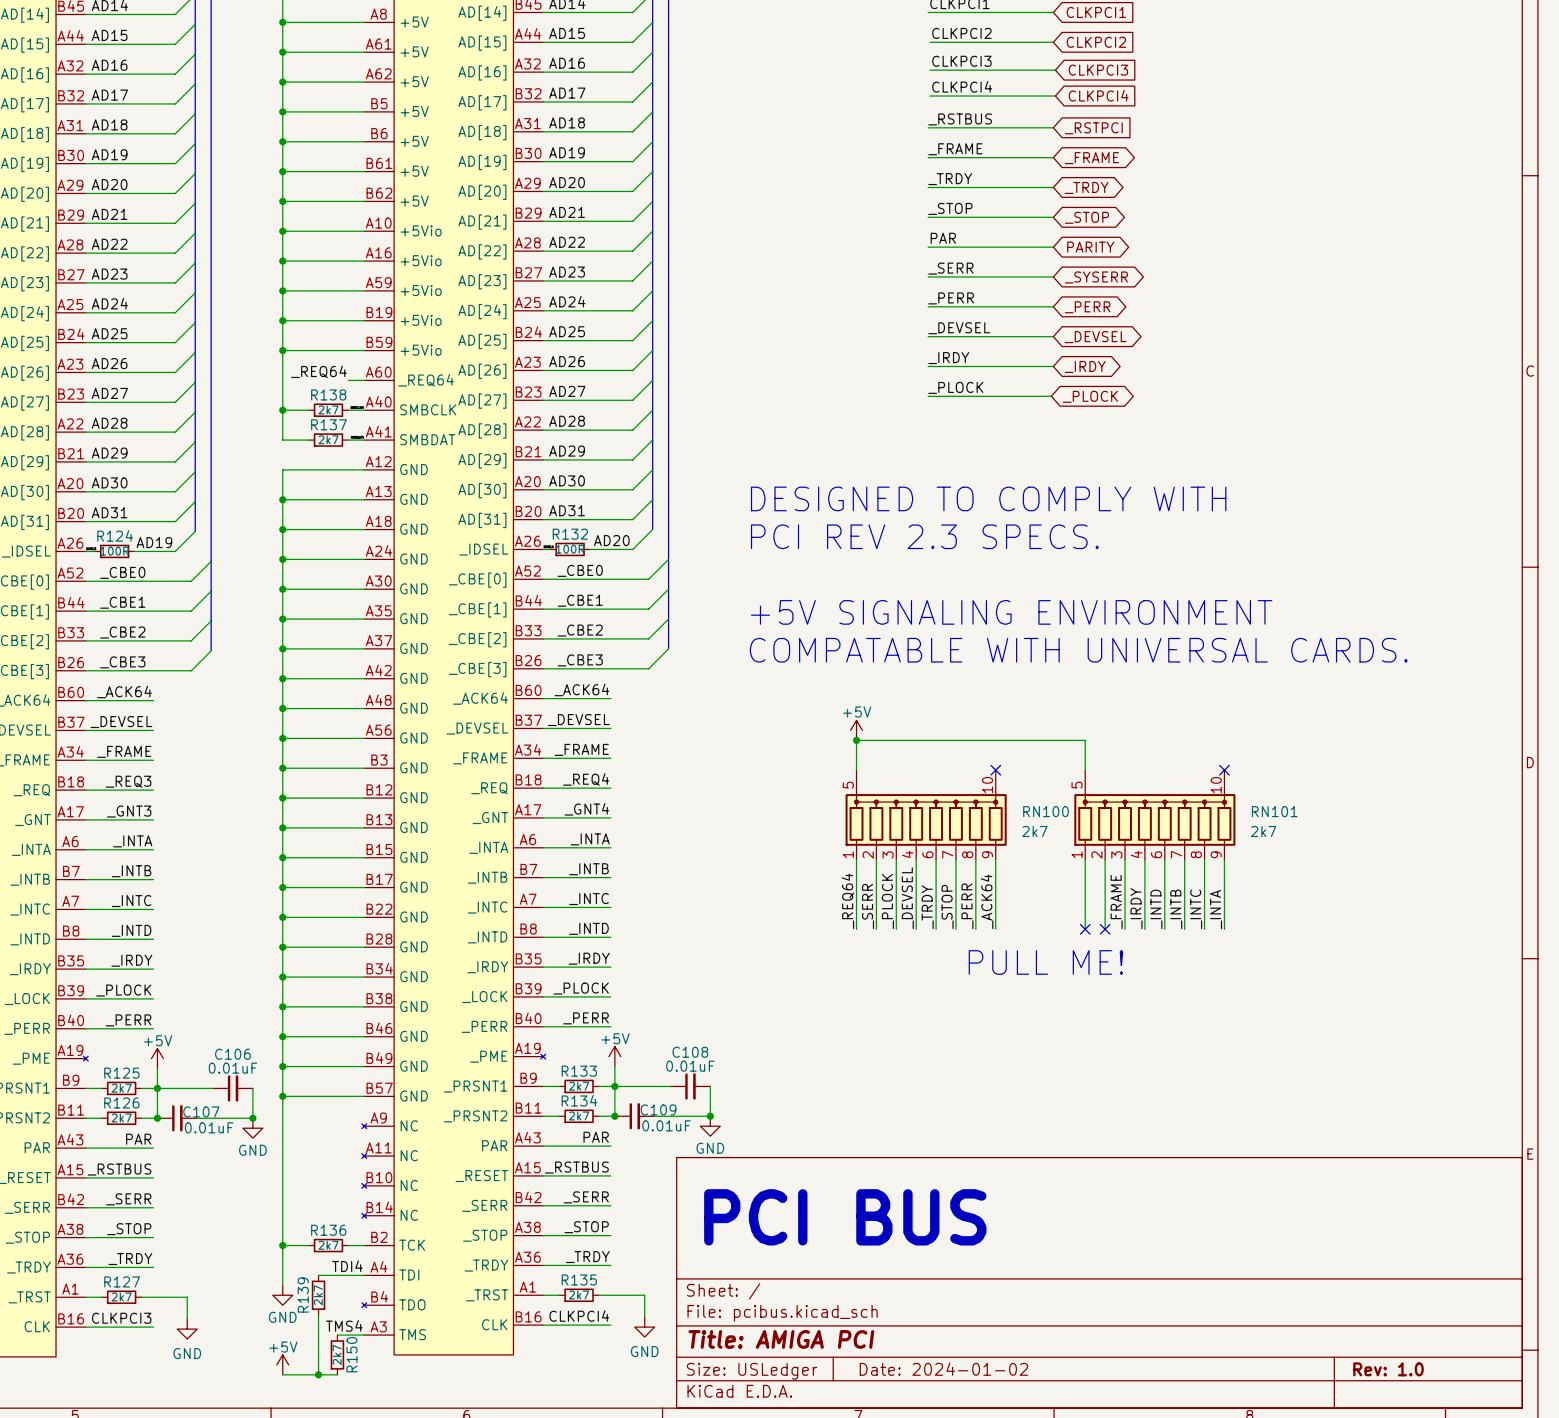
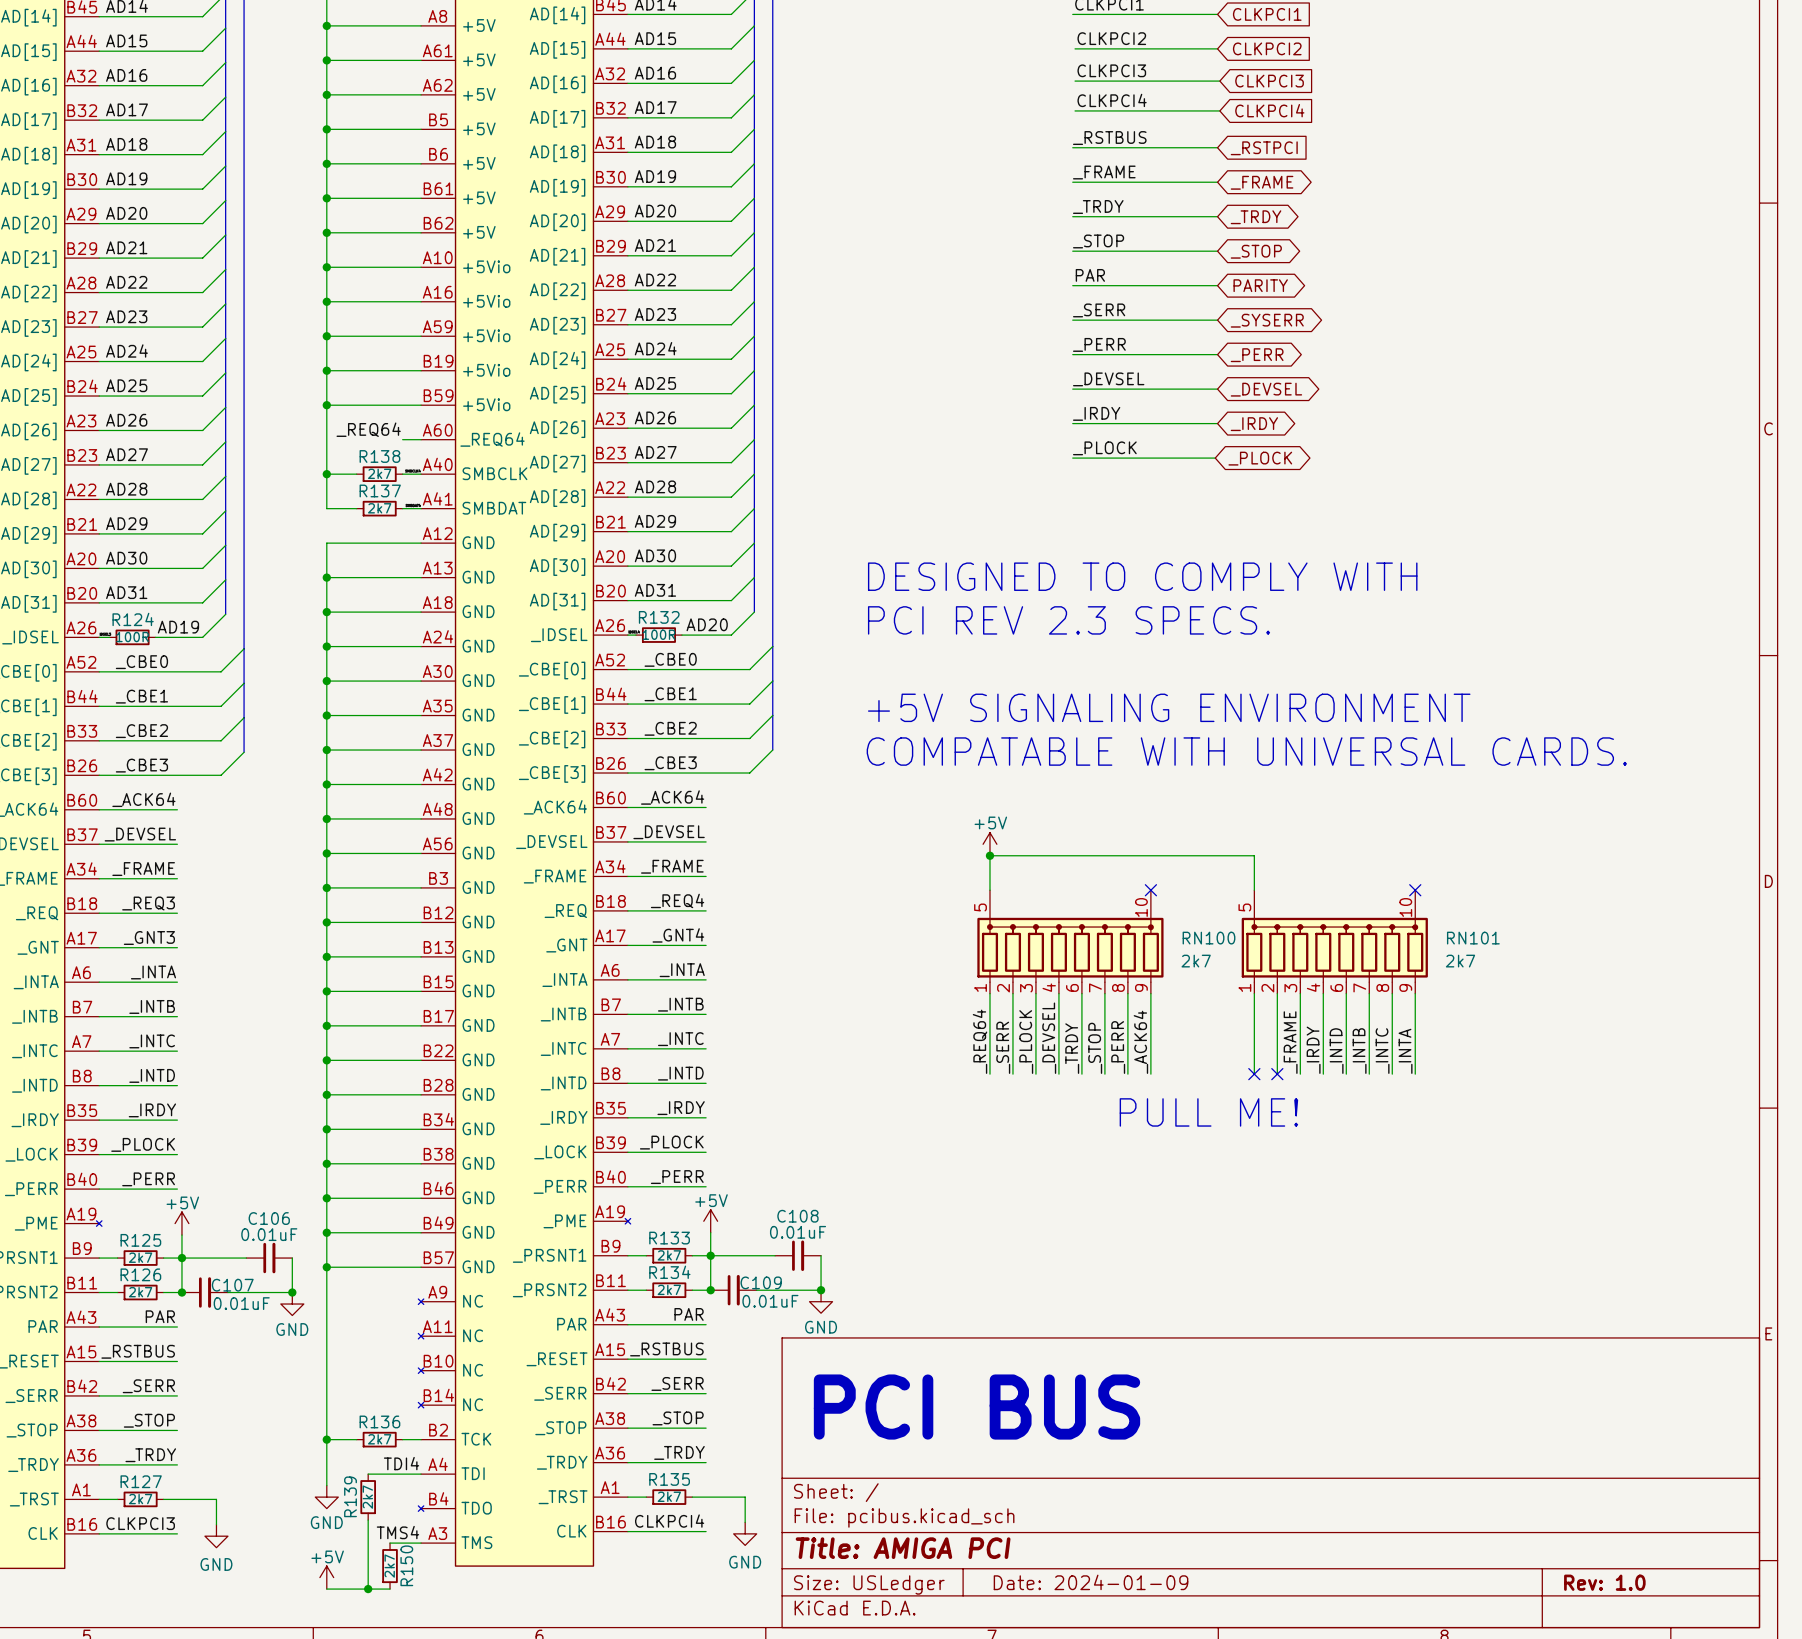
title block: Date: 2024-01-02 (943, 1369) -> Date: 2024-01-09 (1091, 1582)

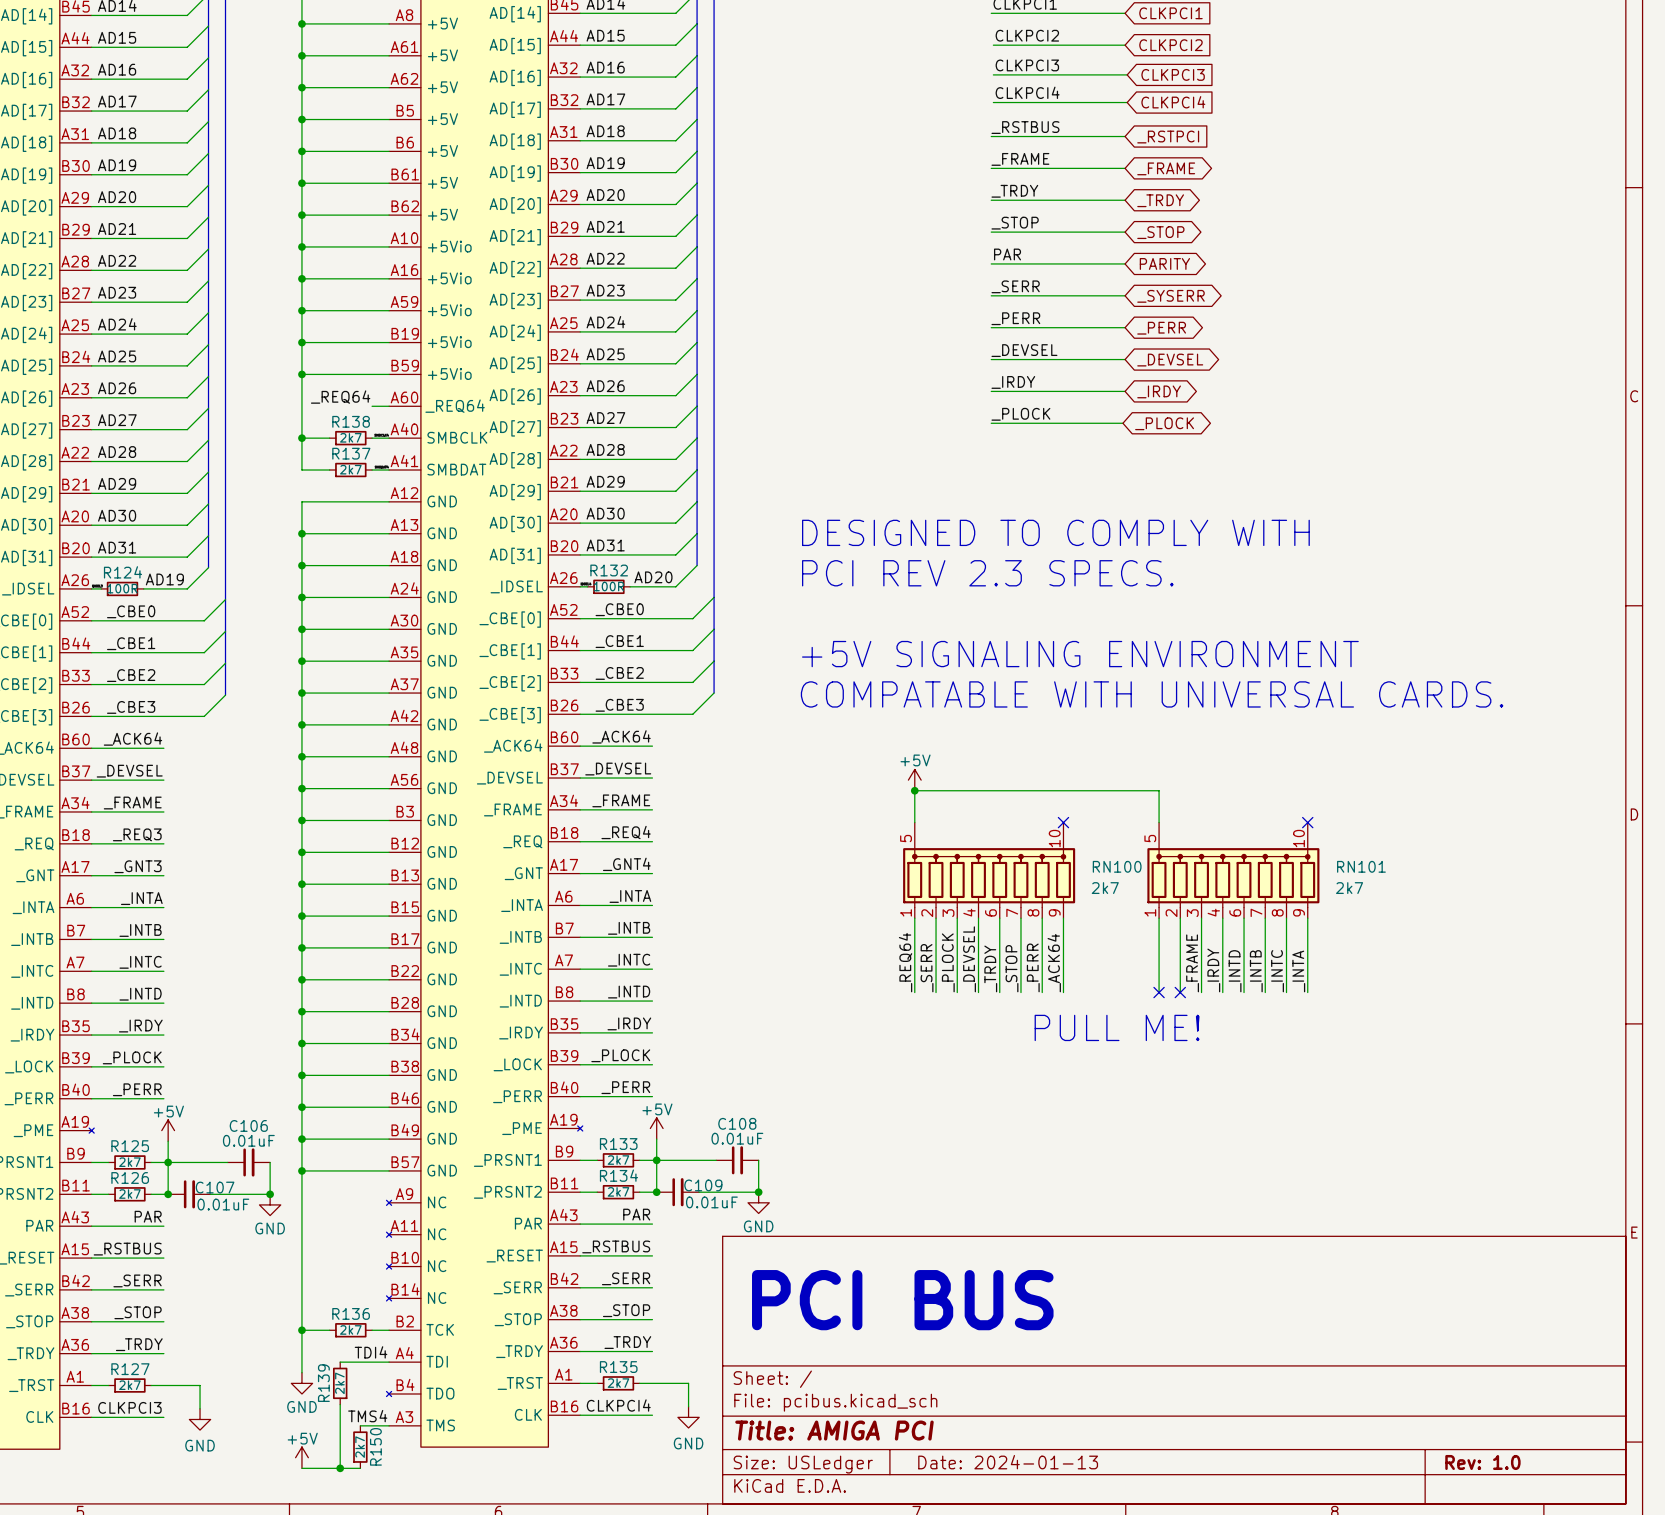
title block: Date: 2024-01-09 (1091, 1582) -> Date: 2024-01-13 (1008, 1462)

